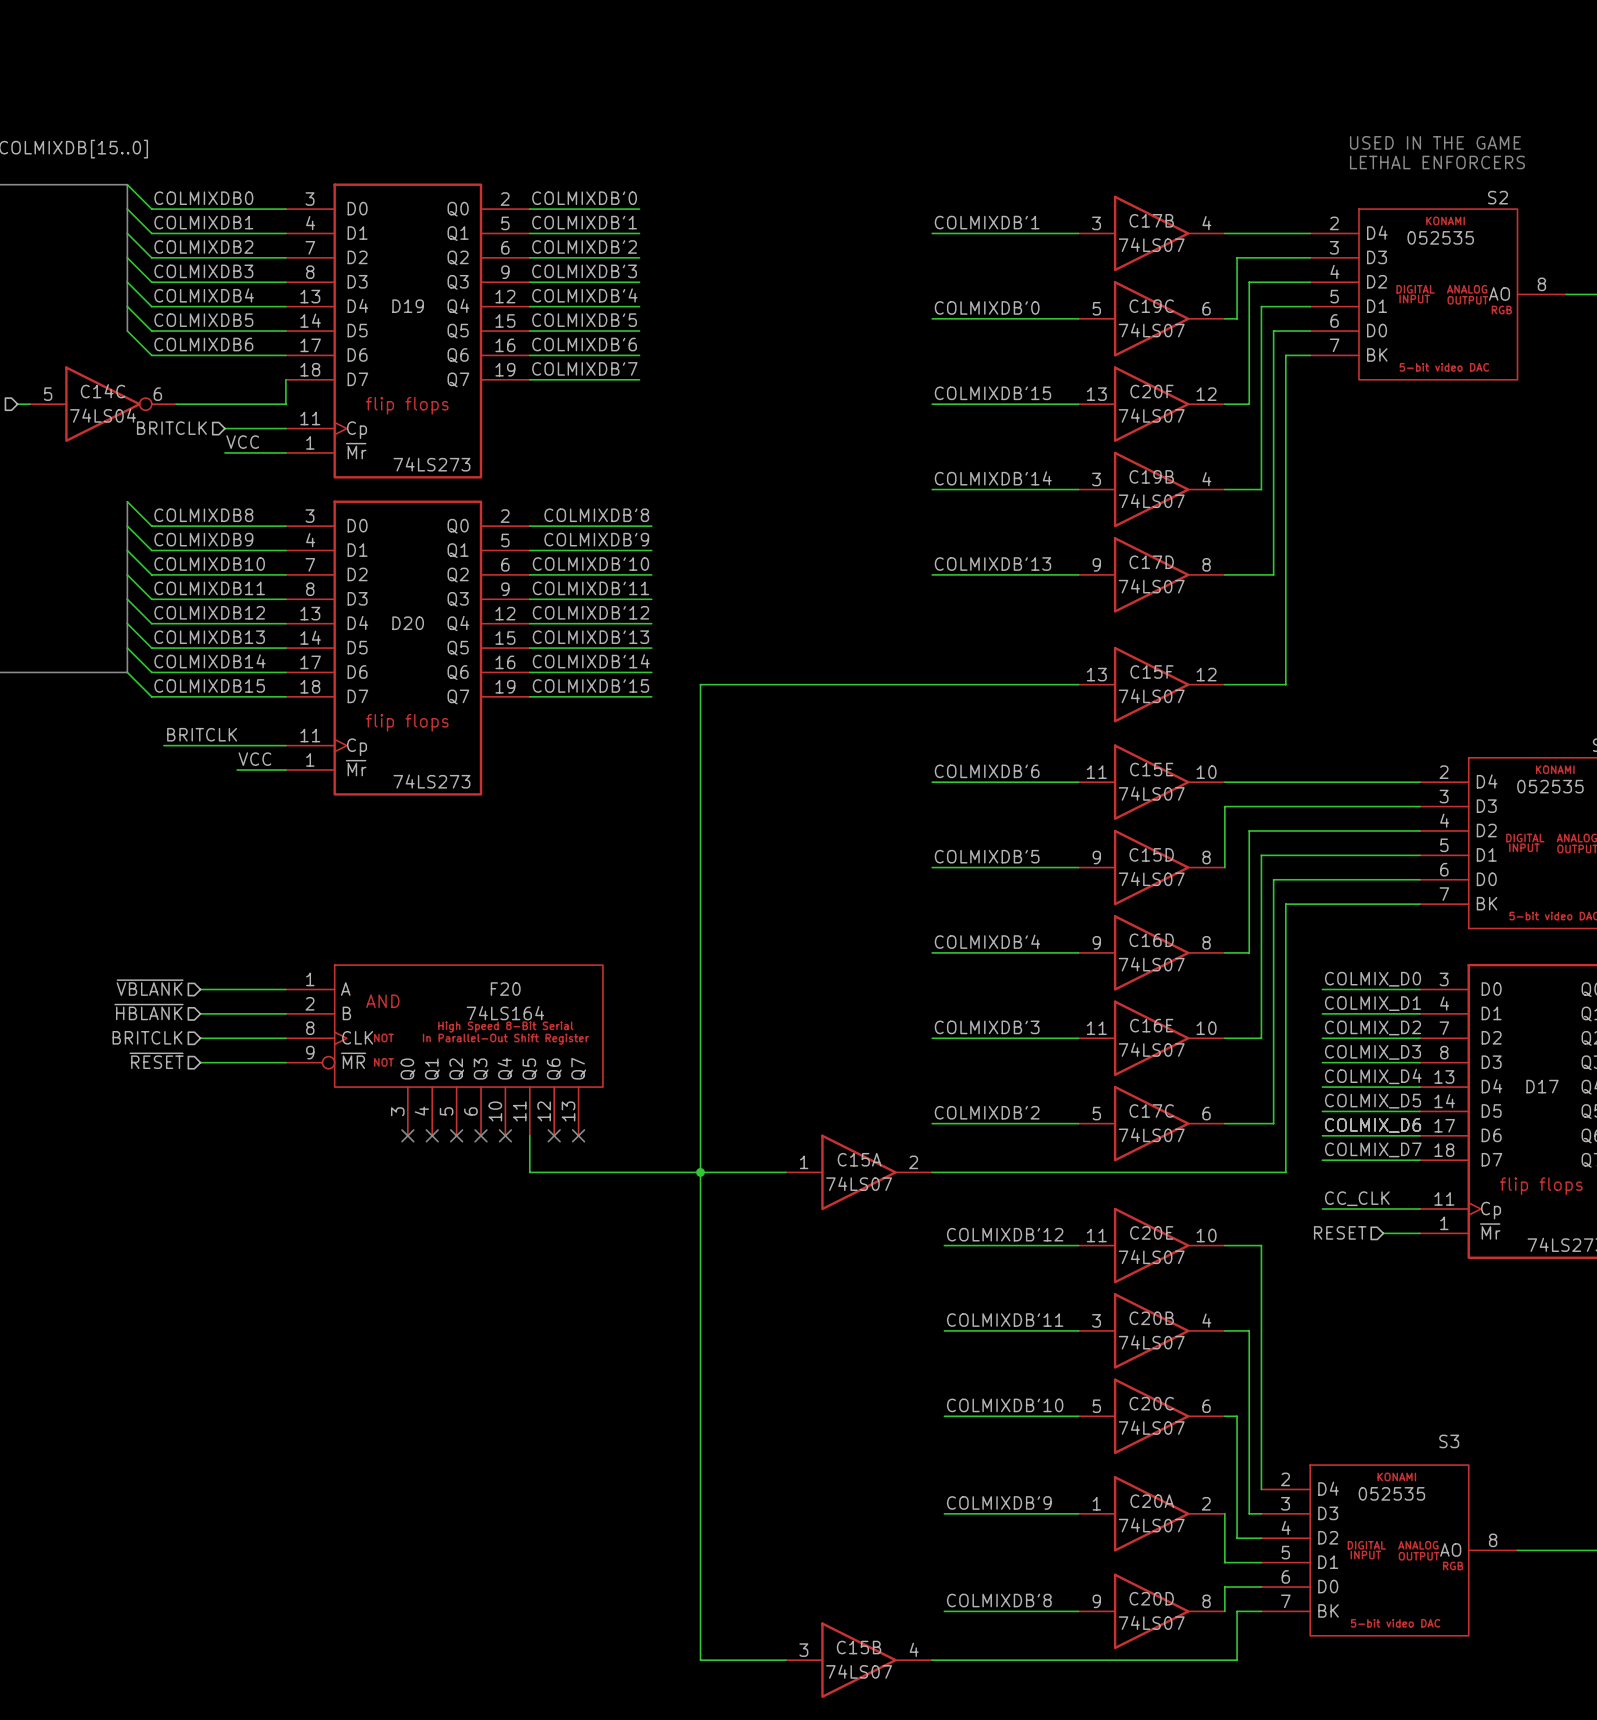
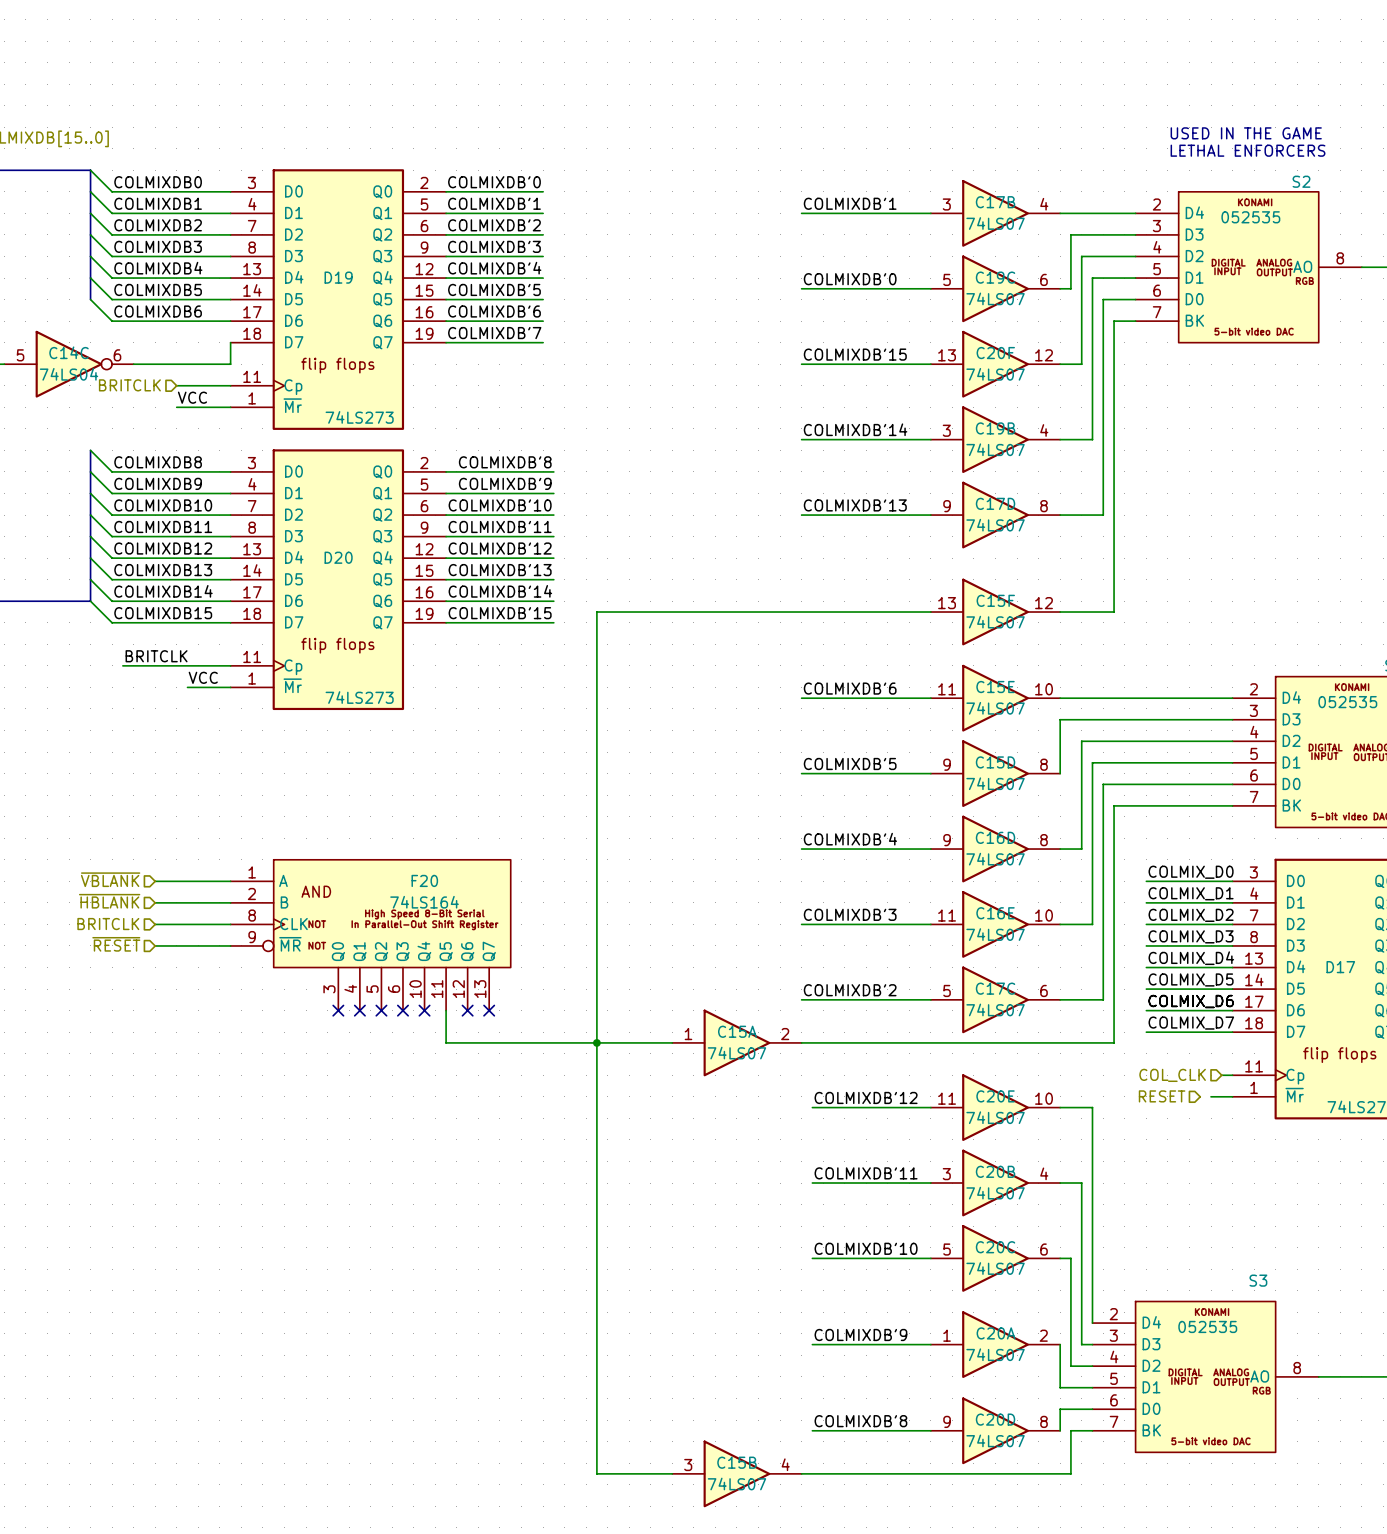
label: CC_CLK (1357, 1198) -> none
wire: (1322, 1208) (1407, 1208) -> none
hierarchical label: none -> COL_CLK (1172, 1075)
wire: (1383, 1233) (1395, 1233) -> none

